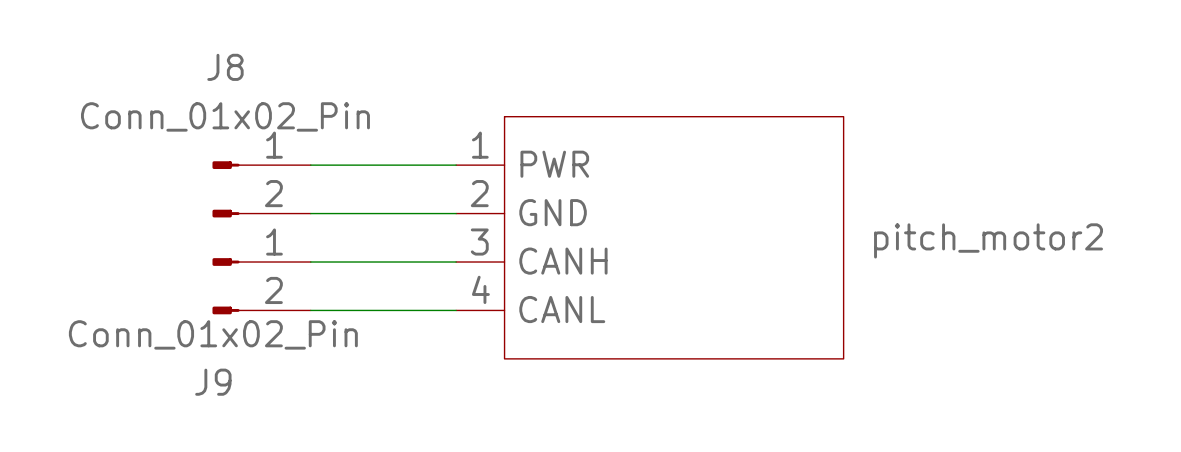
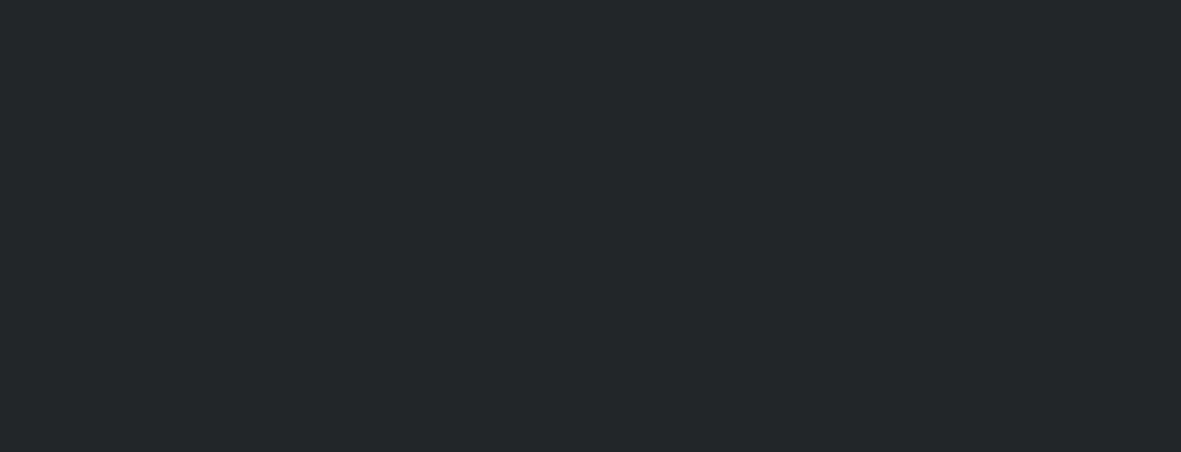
wire: (310, 165) (456, 165) -> none
J8: Conn_01x02_Pin (261, 189) -> none
wire: (310, 213) (456, 213) -> none
pitch_motor2: (649, 237) -> none
wire: (310, 262) (456, 262) -> none
J9: Conn_01x02_Pin (261, 286) -> none
wire: (310, 310) (456, 310) -> none

